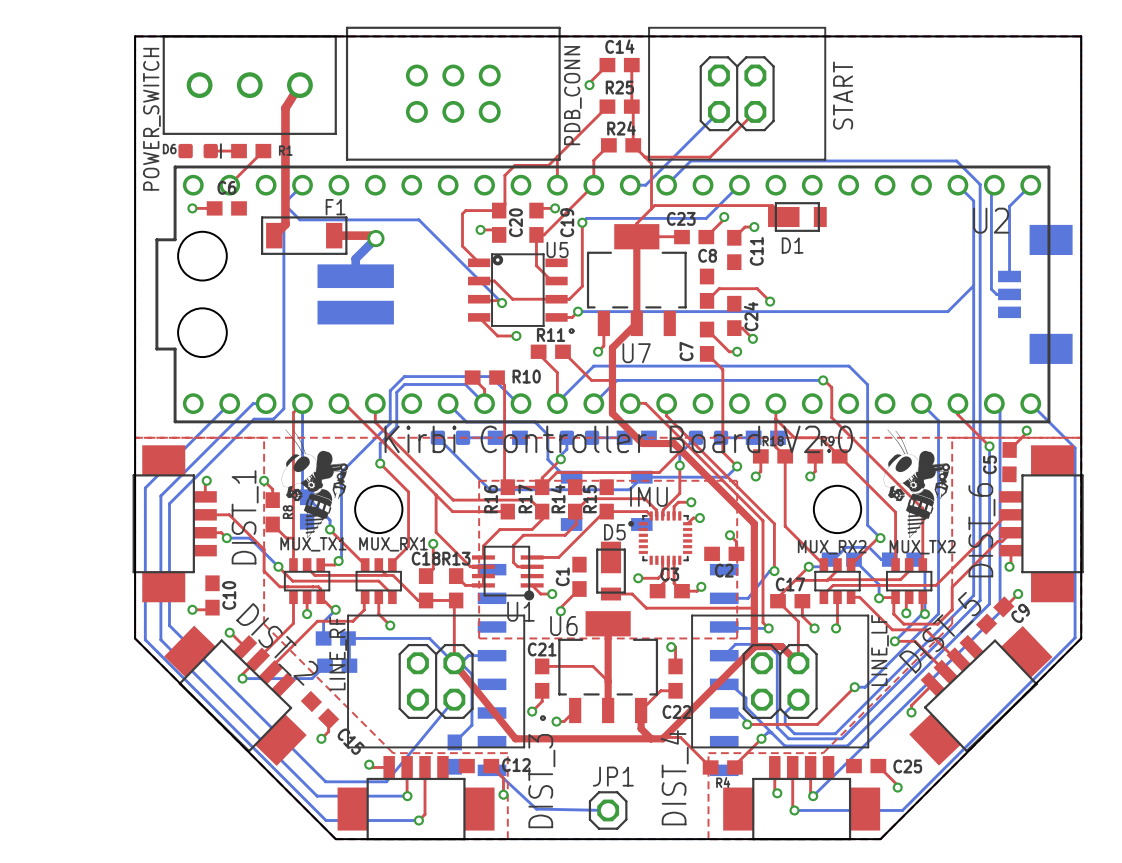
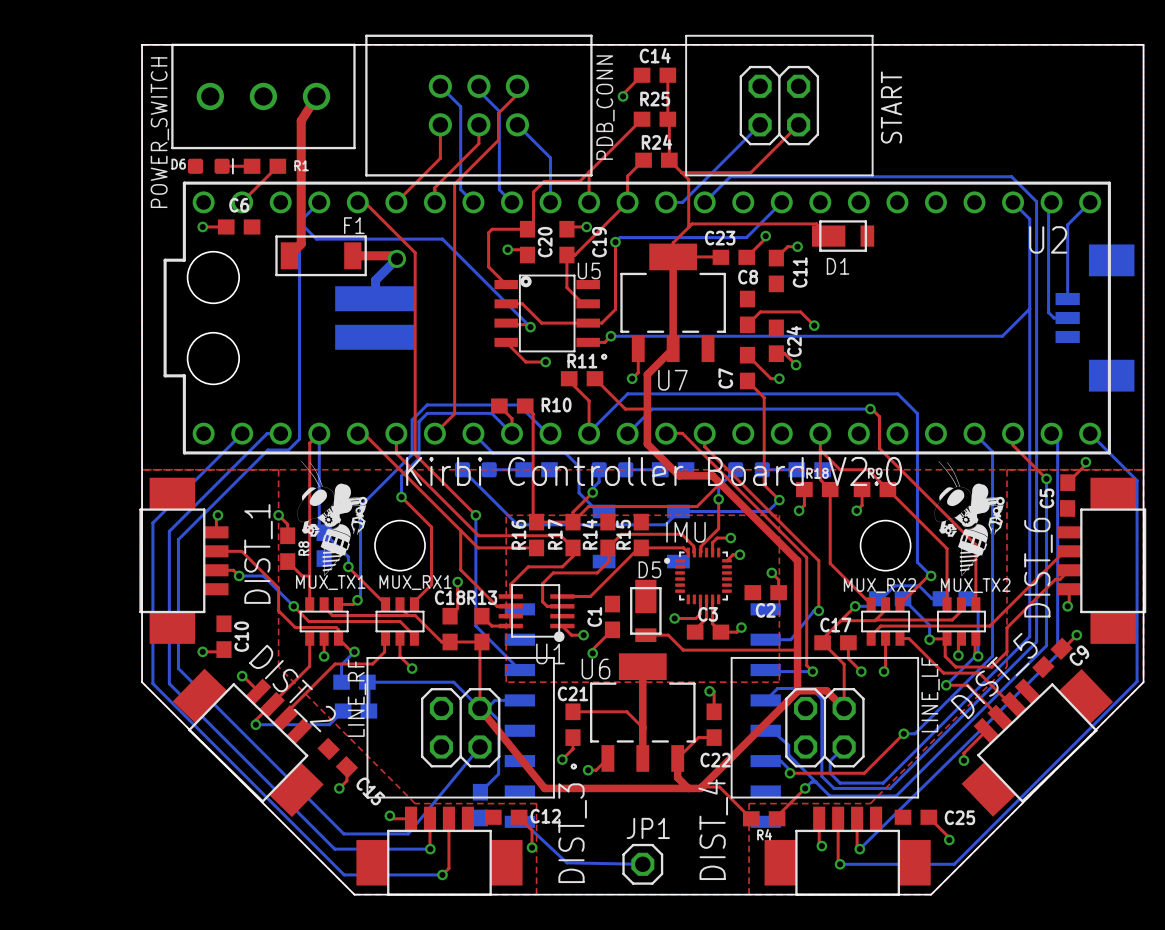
bottom track: none -> (440, 86) (460, 106) (460, 189) (473, 202)
bottom track: none -> (478, 86) (478, 90) (499, 111) (499, 189) (511, 202)
top track: none -> (517, 86) (517, 94) (498, 113) (498, 140) (454, 184) (454, 413) (434, 433)
top track: none -> (440, 124) (440, 158) (396, 202)
top track: none -> (478, 124) (478, 143) (434, 188) (434, 202)
bottom track: none -> (517, 124) (550, 157) (550, 202)
top track: none -> (357, 202) (364, 202) (415, 252) (415, 454) (475, 515)
bottom track: none -> (475, 515) (475, 626) (519, 670)
via: none -> (475, 515)

